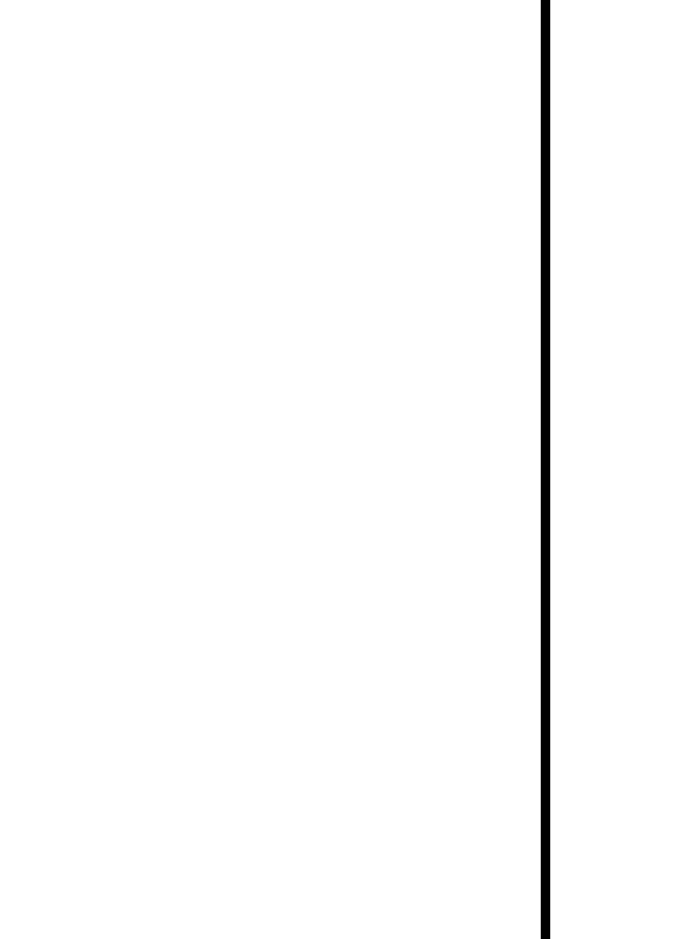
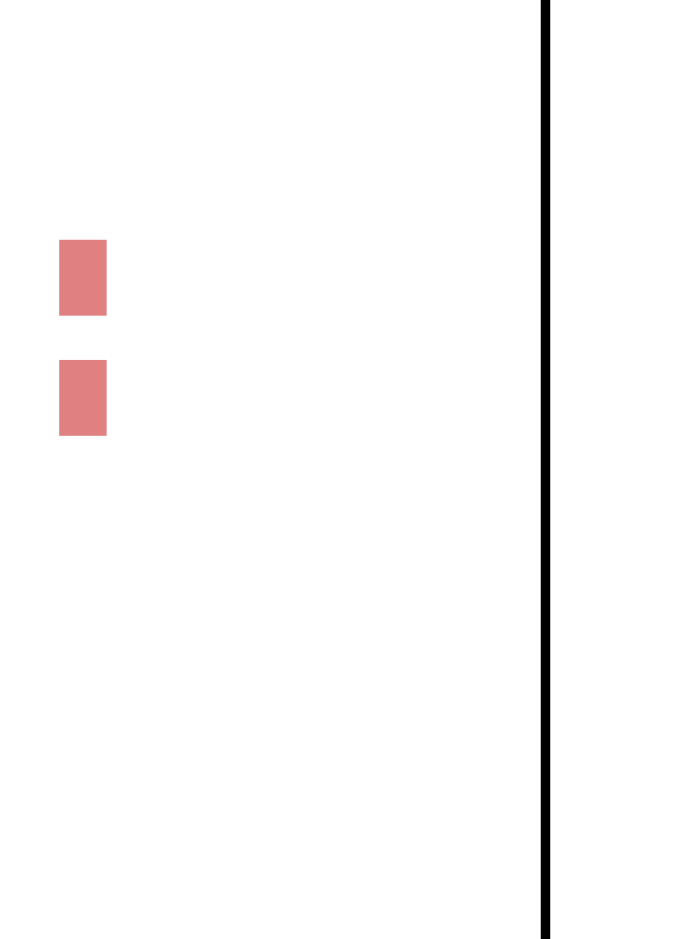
part: none -> (82, 337)

